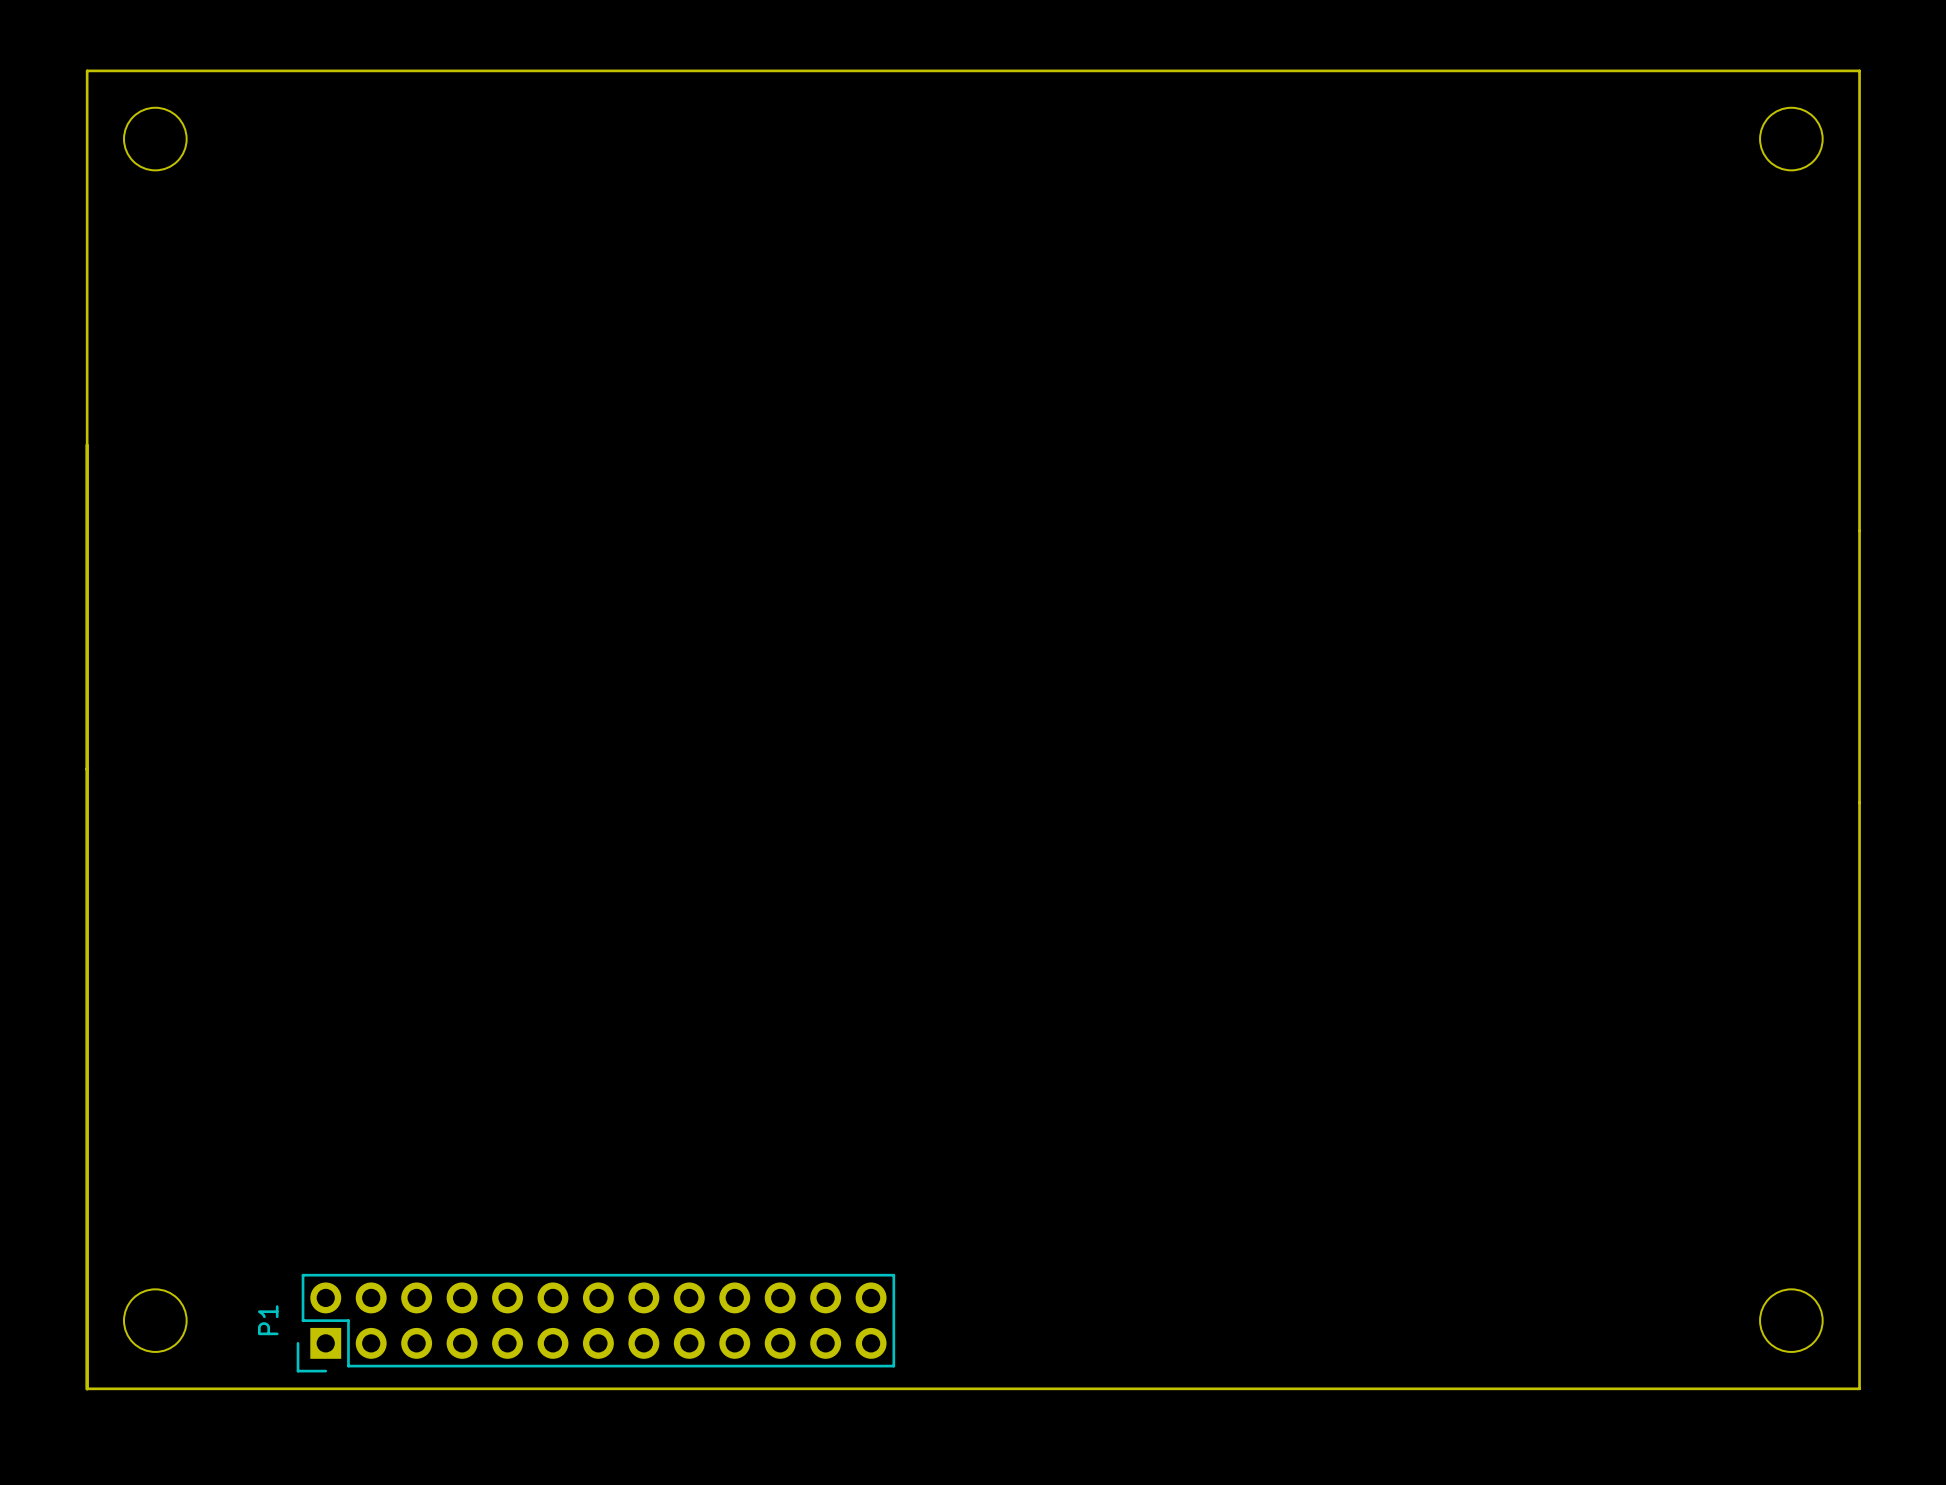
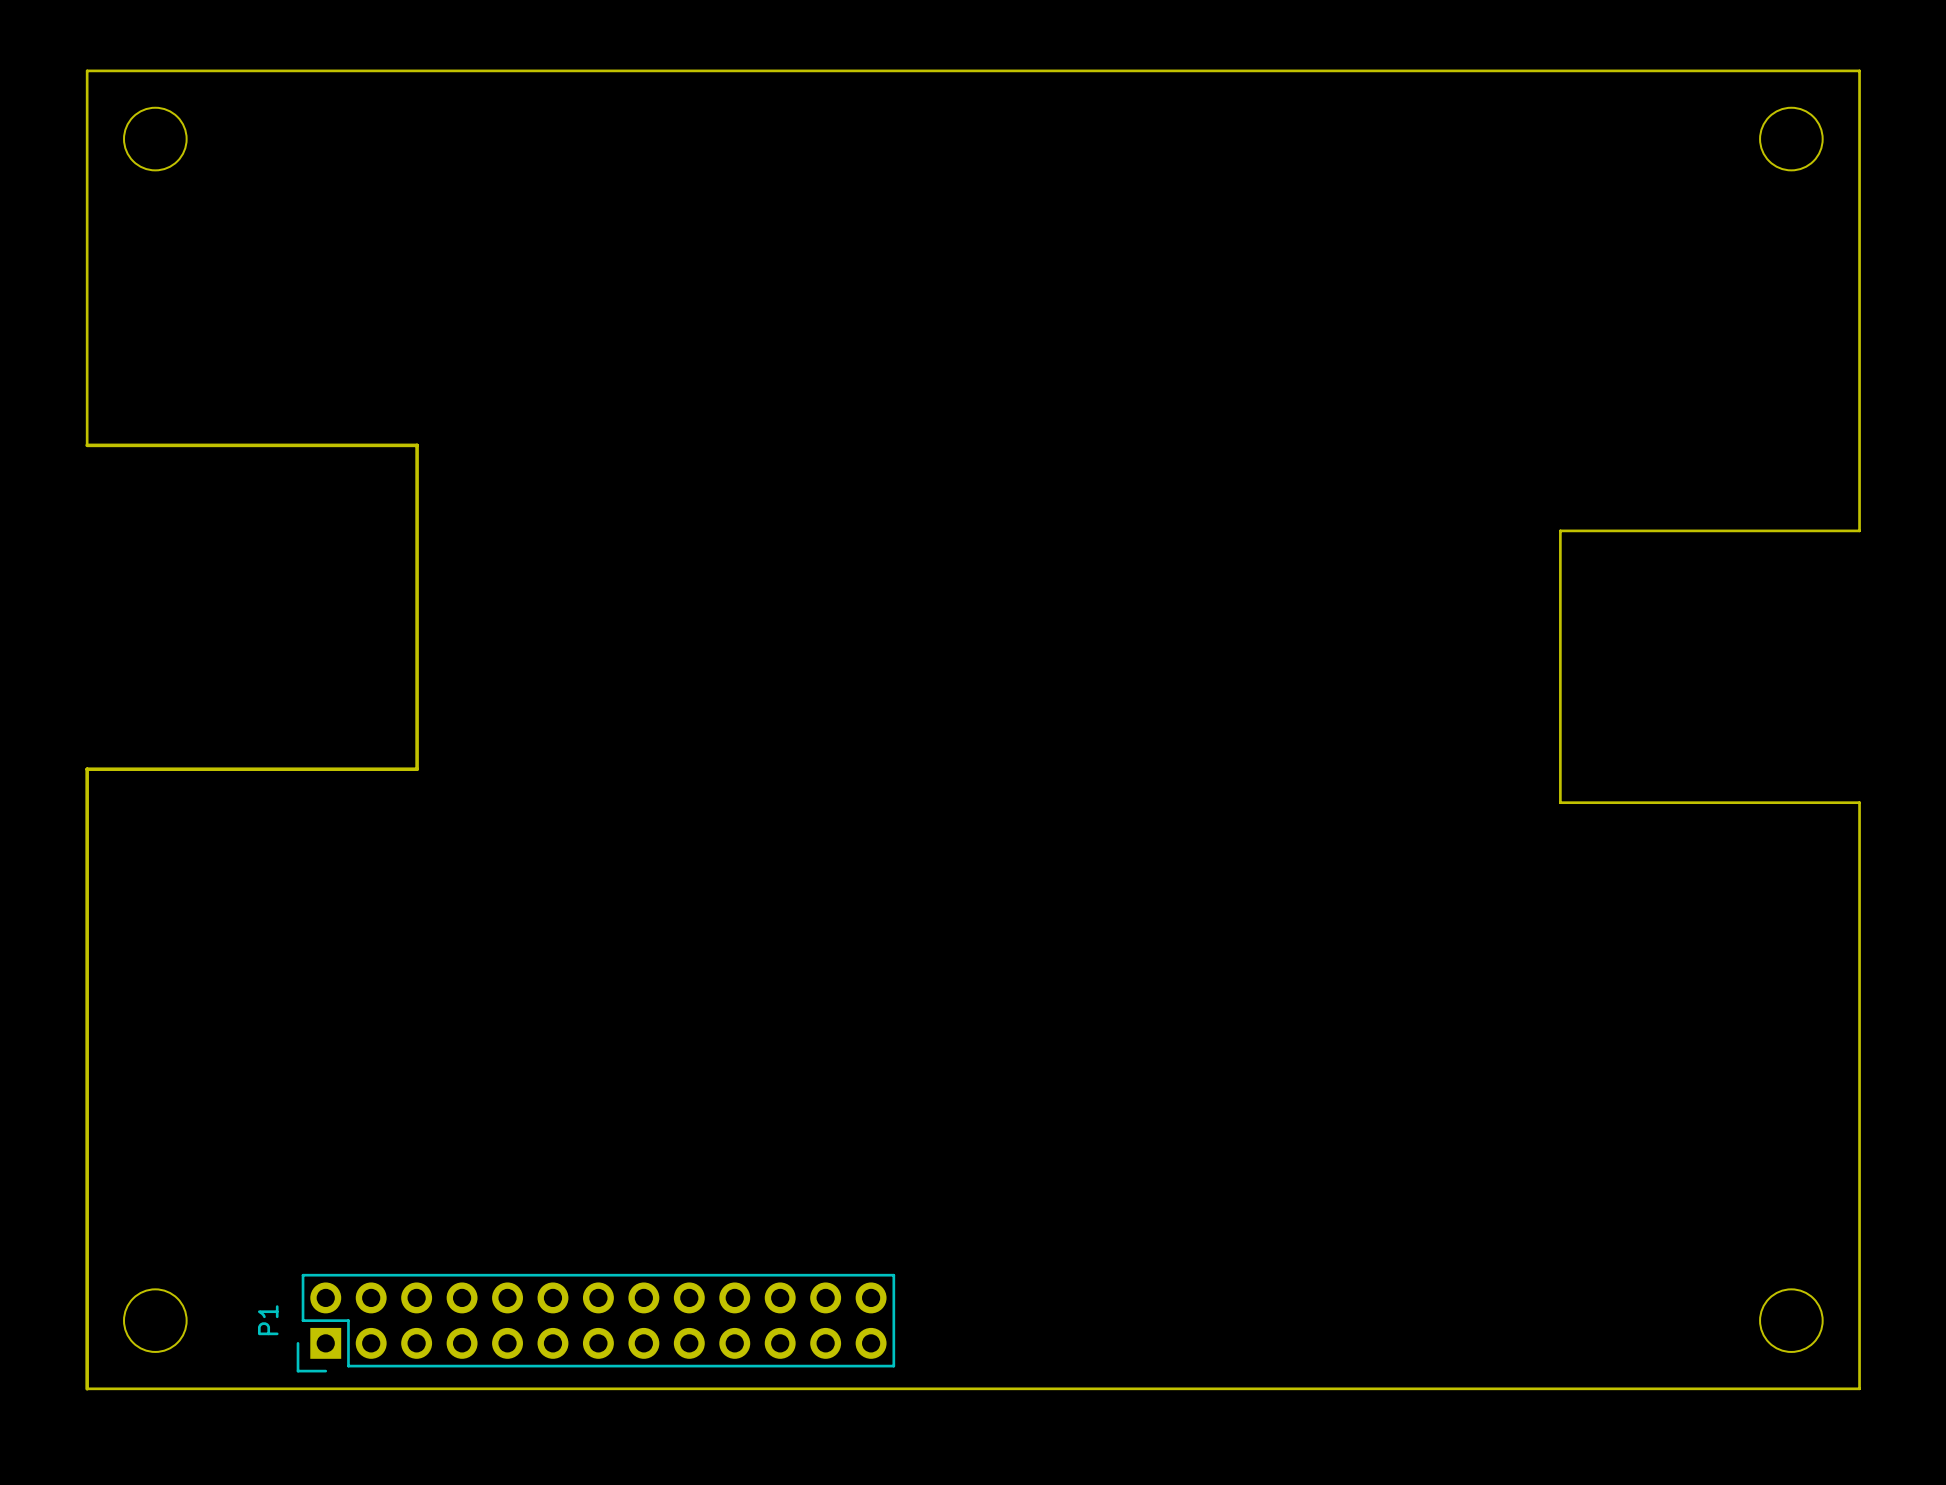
board edge: (87, 445) (87, 769) -> (87, 445) (417, 445) (417, 769) (87, 769)
board edge: (1859, 530) (1859, 802) -> (1859, 530) (1560, 530) (1560, 802) (1859, 802)

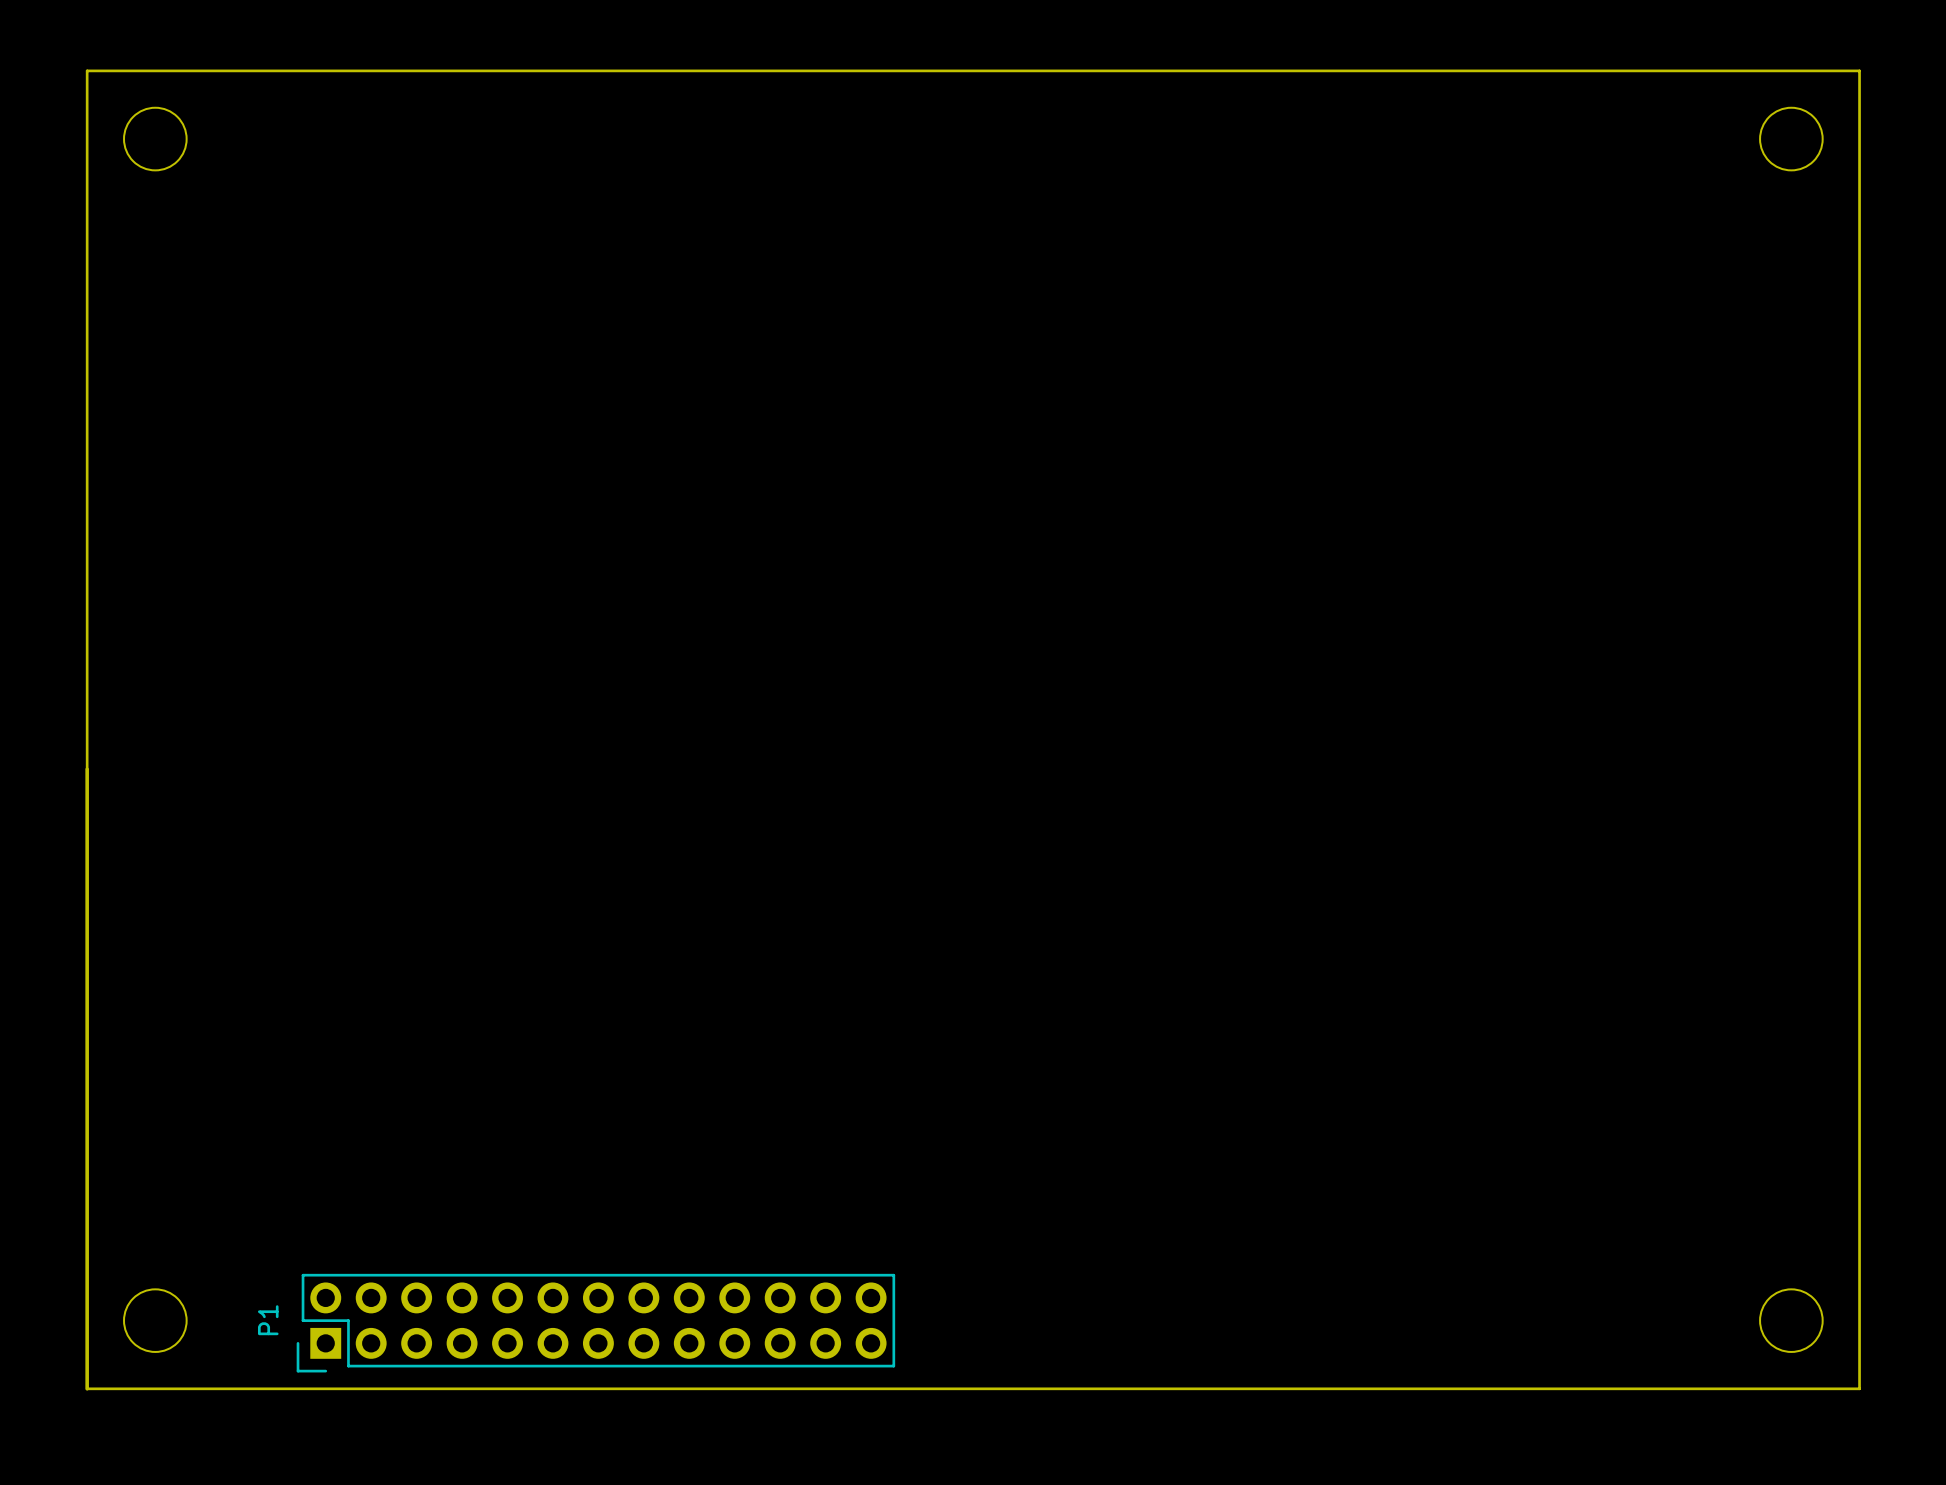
board edge: (87, 445) (417, 445) (417, 769) (87, 769) -> (87, 445) (87, 769)
board edge: (1859, 530) (1560, 530) (1560, 802) (1859, 802) -> (1859, 530) (1859, 802)

